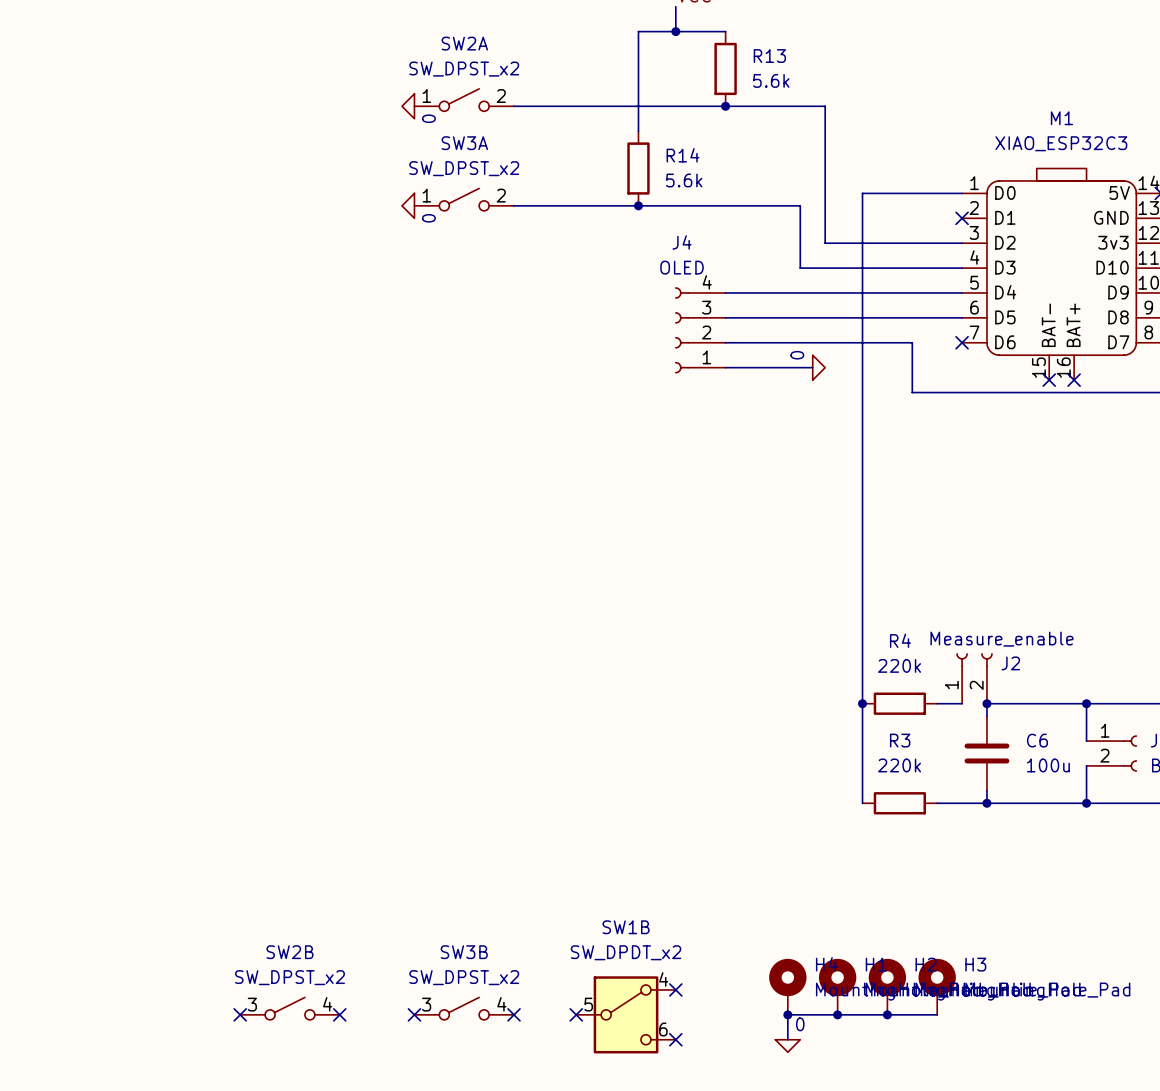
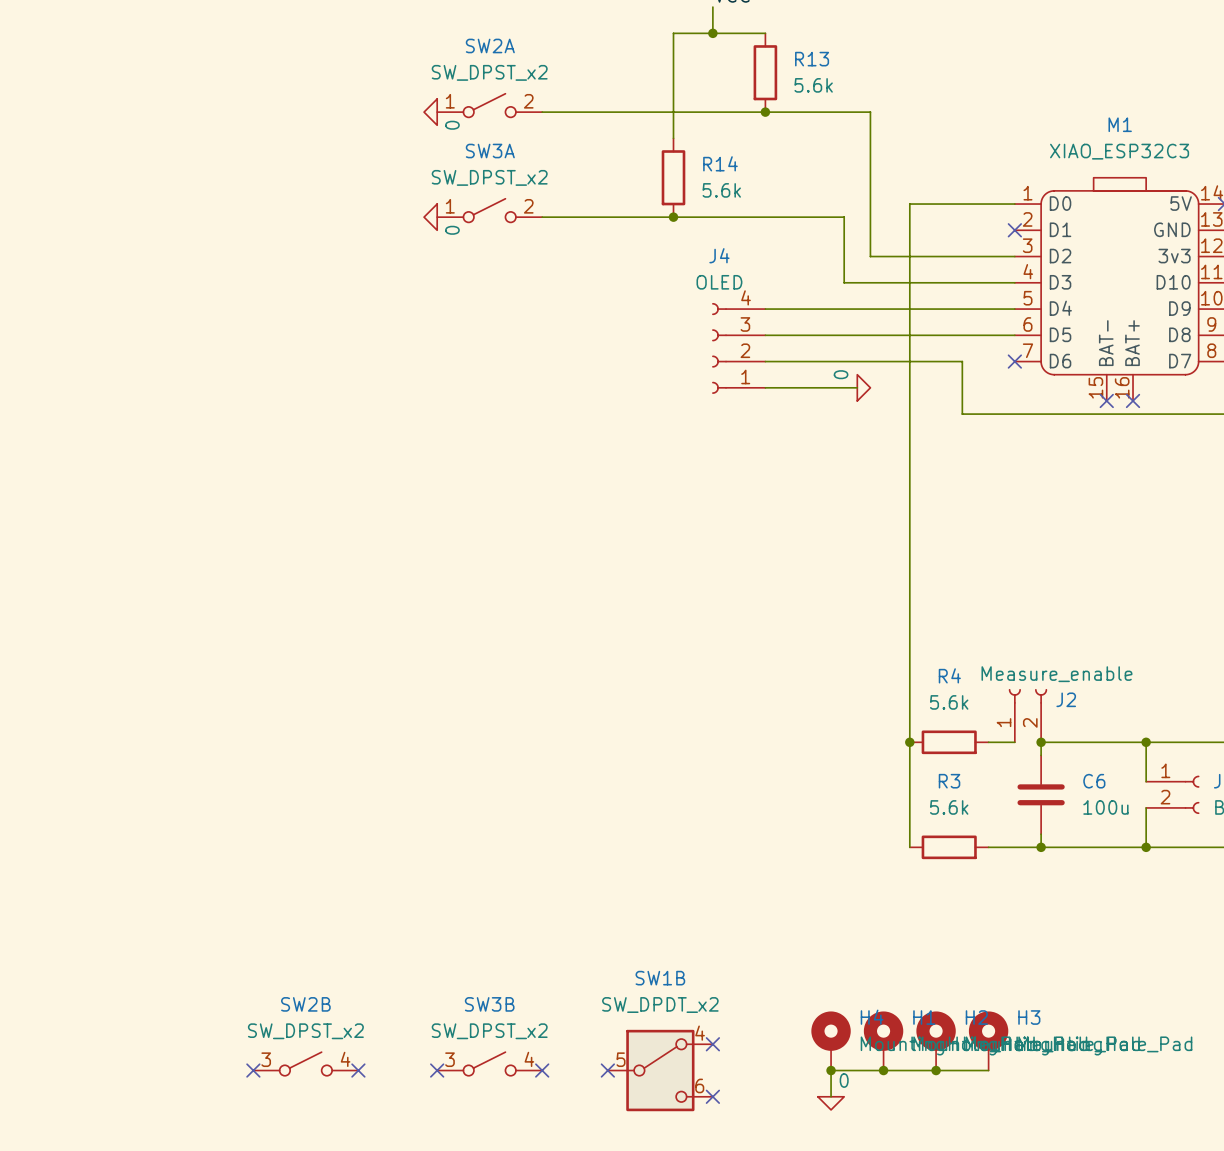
R4 value: 220k (899, 665) -> 5.6k (949, 702)
R3 value: 220k (899, 765) -> 5.6k (949, 807)

